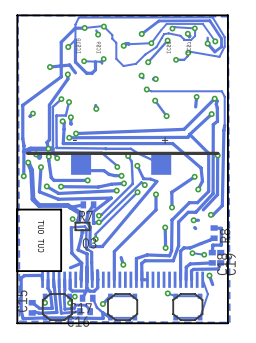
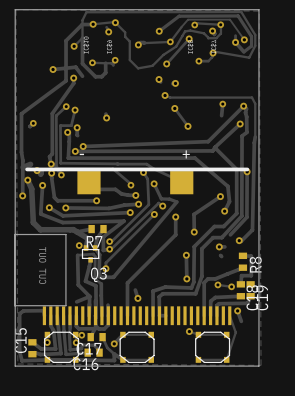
track: (52, 148) (30, 148) -> none

